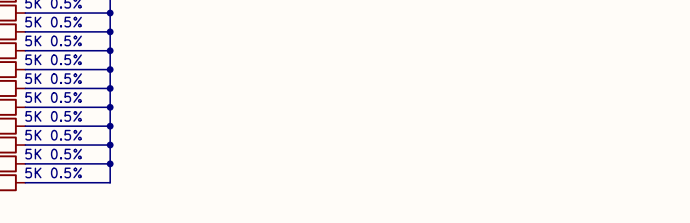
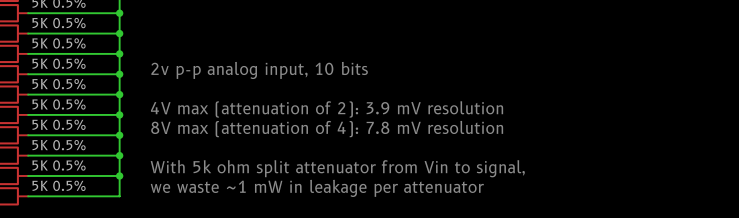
text: none -> 2v p-p analog input, 10 bits (259, 70)
text: none -> 4V max (attenuation of 2): 3.9 mV resolution (327, 109)
text: none -> 8V max (attenuation of 4): 7.8 mV resolution (327, 129)
text: none -> With 5k ohm split attenuator from Vin to signal, (337, 168)
text: none -> we waste ~1 mW in leakage per attenuator (317, 188)

